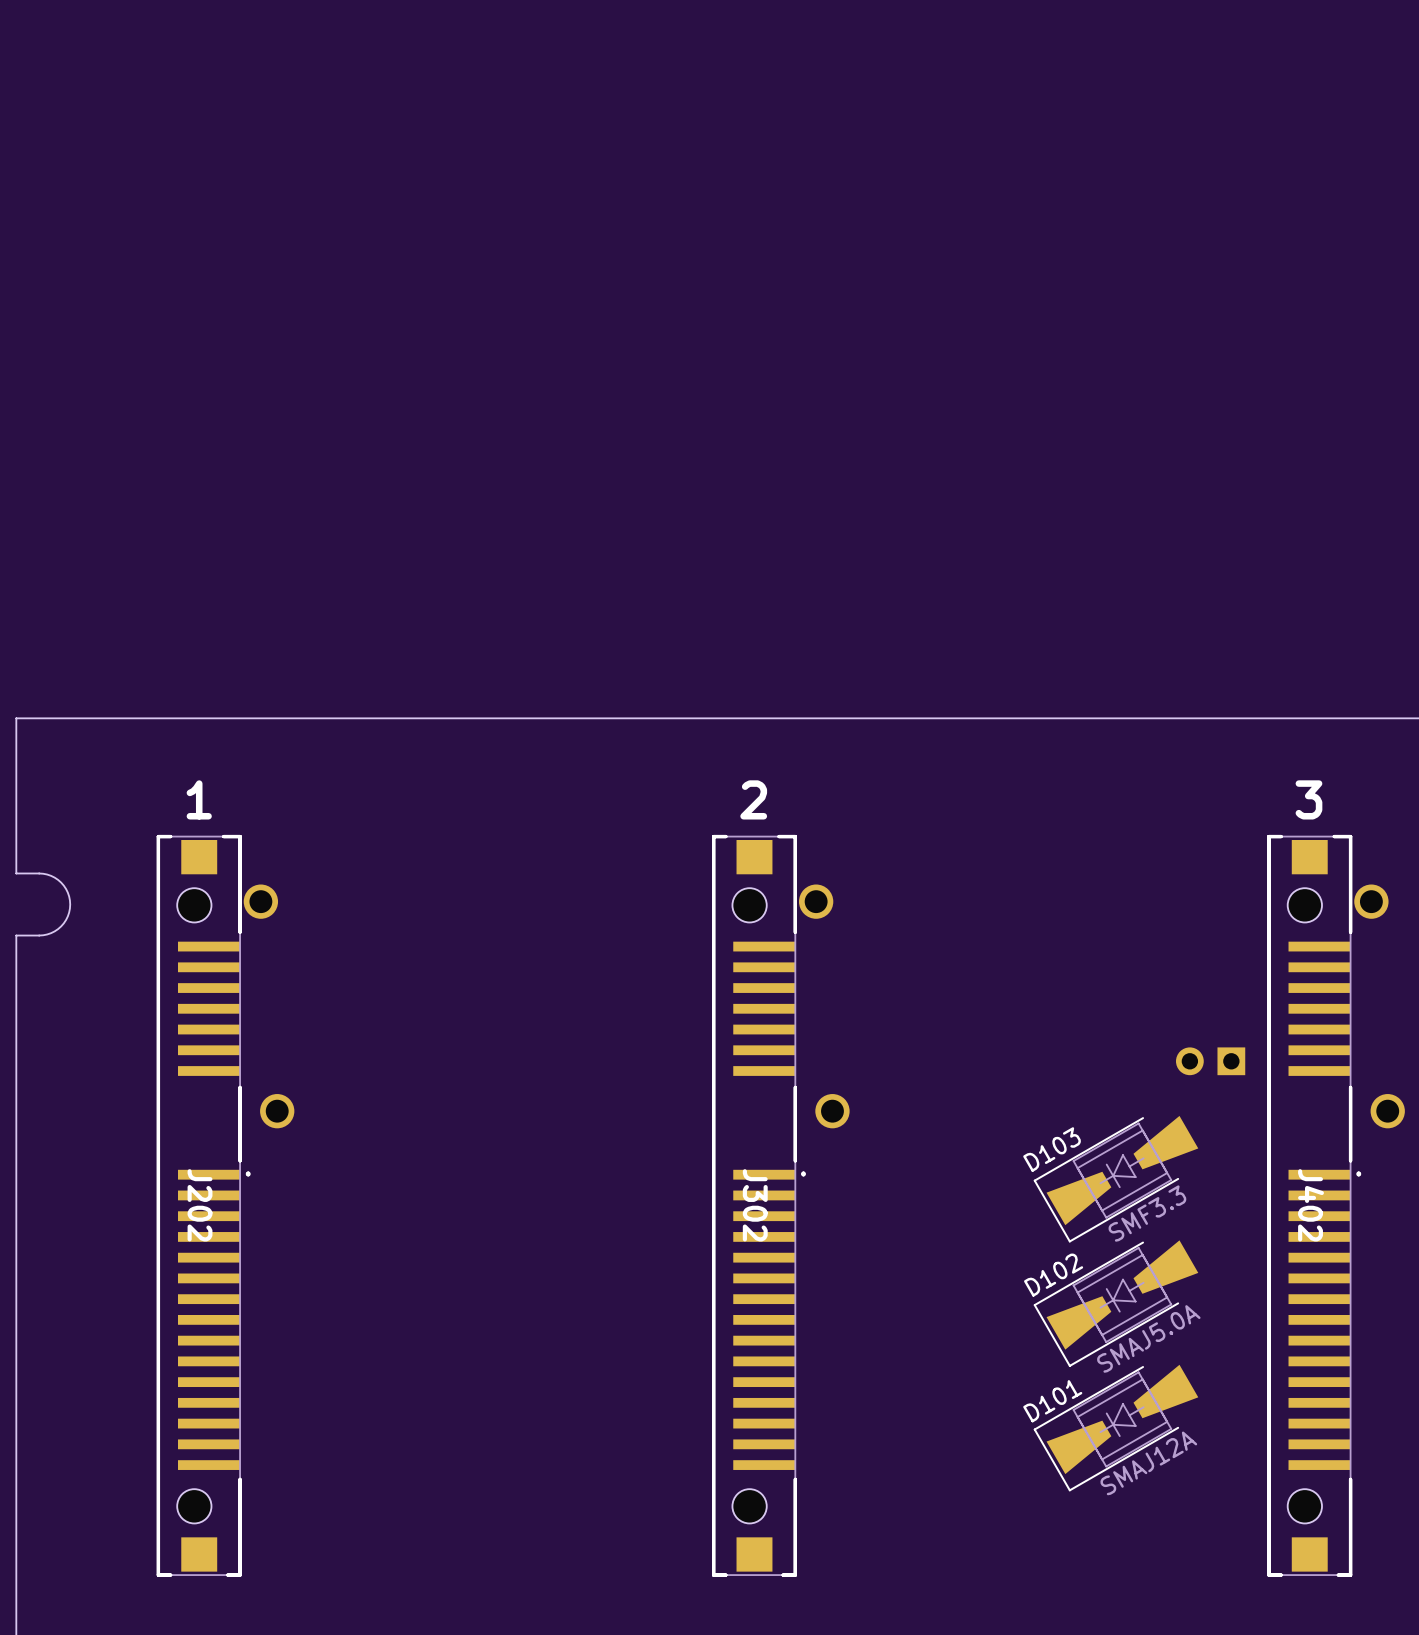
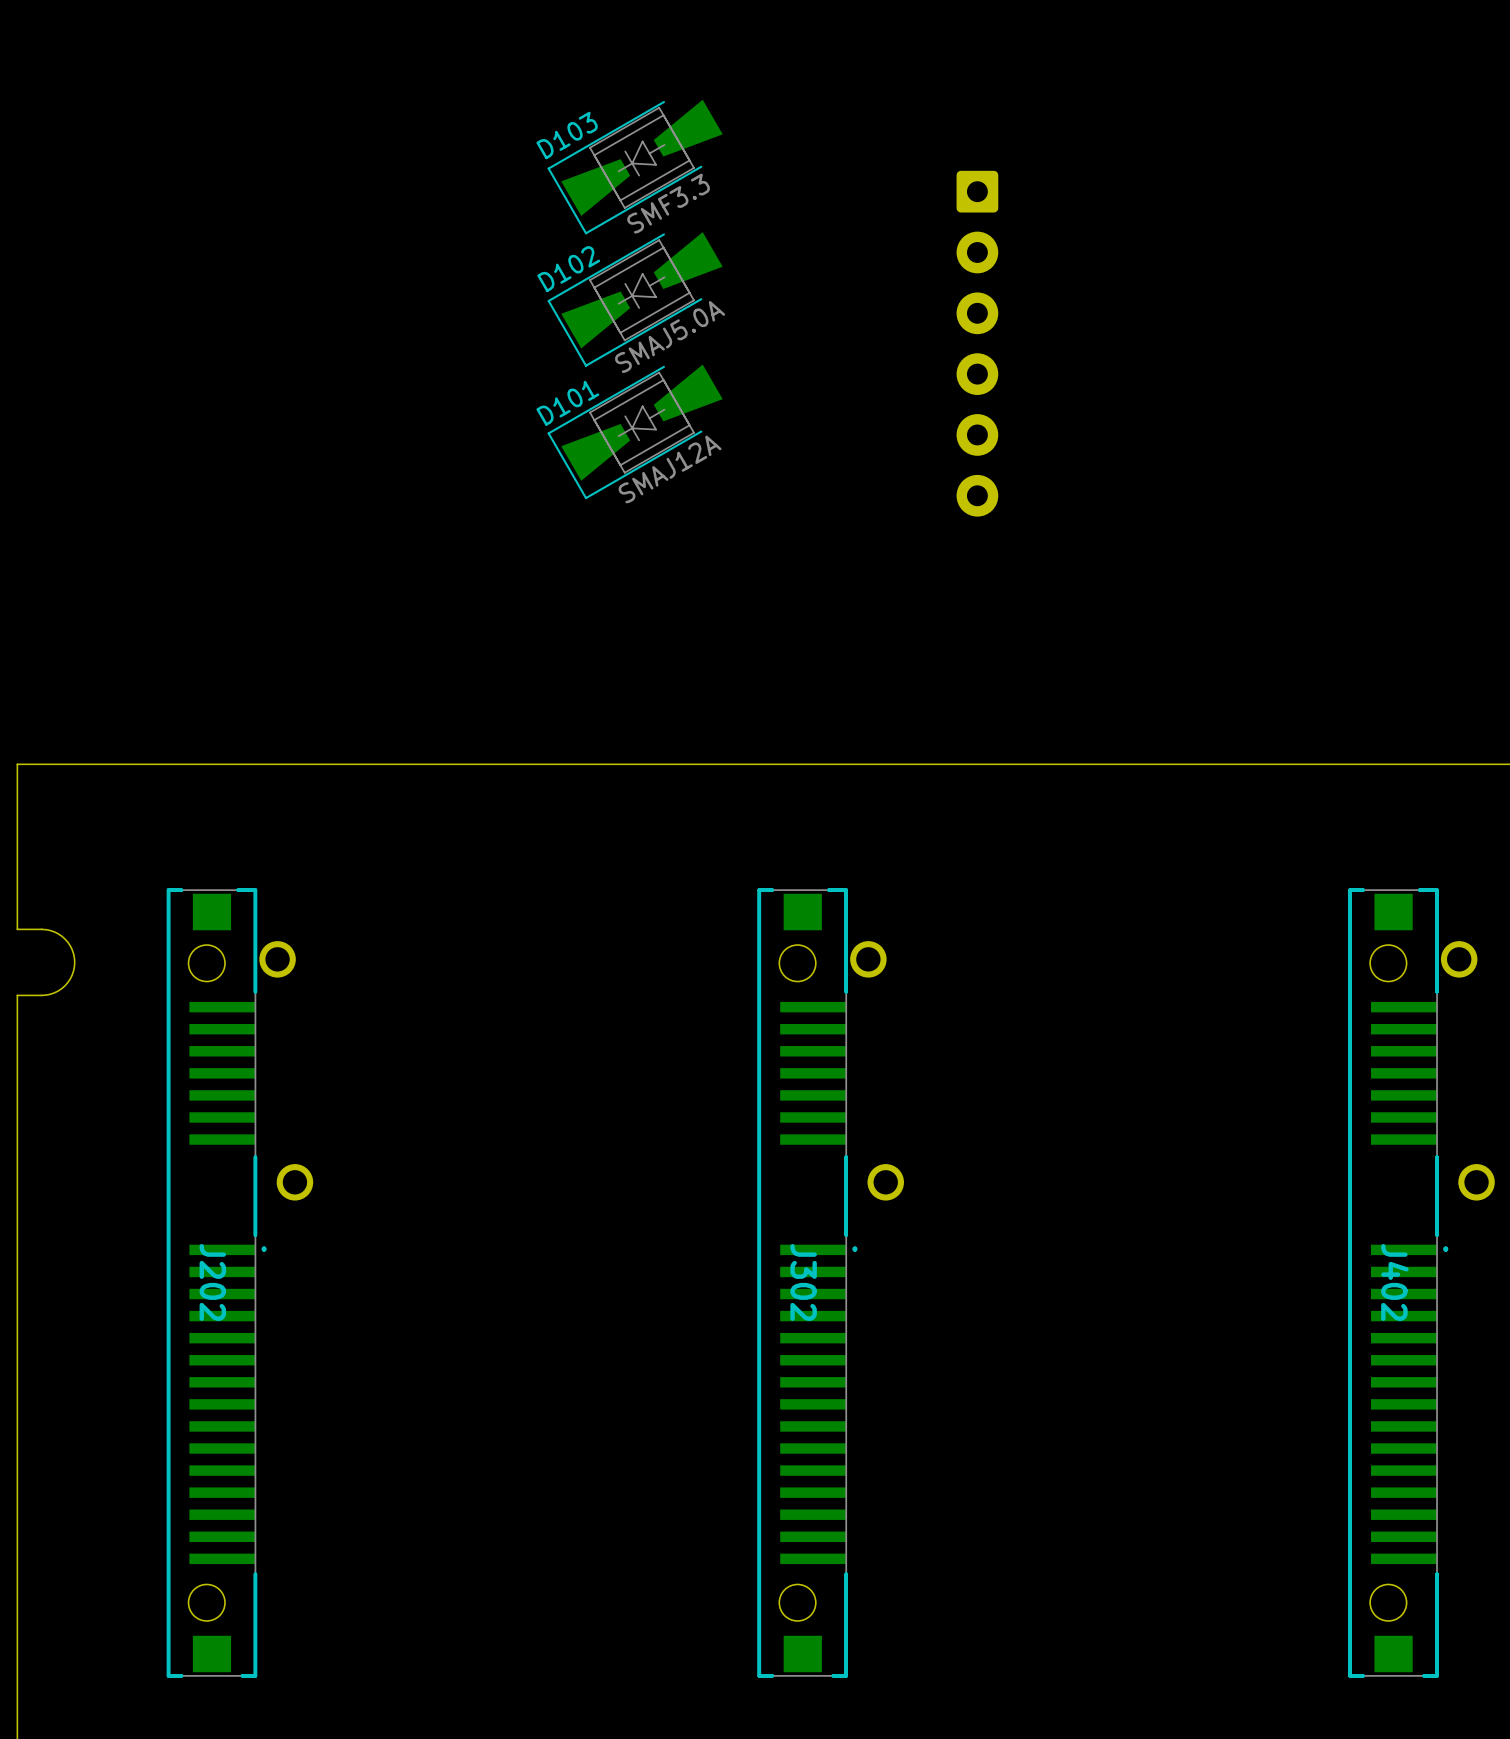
part: none -> (977, 343)
text: 1 (199, 799) -> none
text: 2 (753, 799) -> none
text: 3 (1308, 799) -> none
part: (1210, 1061) -> none
D103 position: (1116, 1179) -> (635, 167)
D102 position: (1116, 1303) -> (635, 299)
D101 position: (1116, 1428) -> (635, 431)

